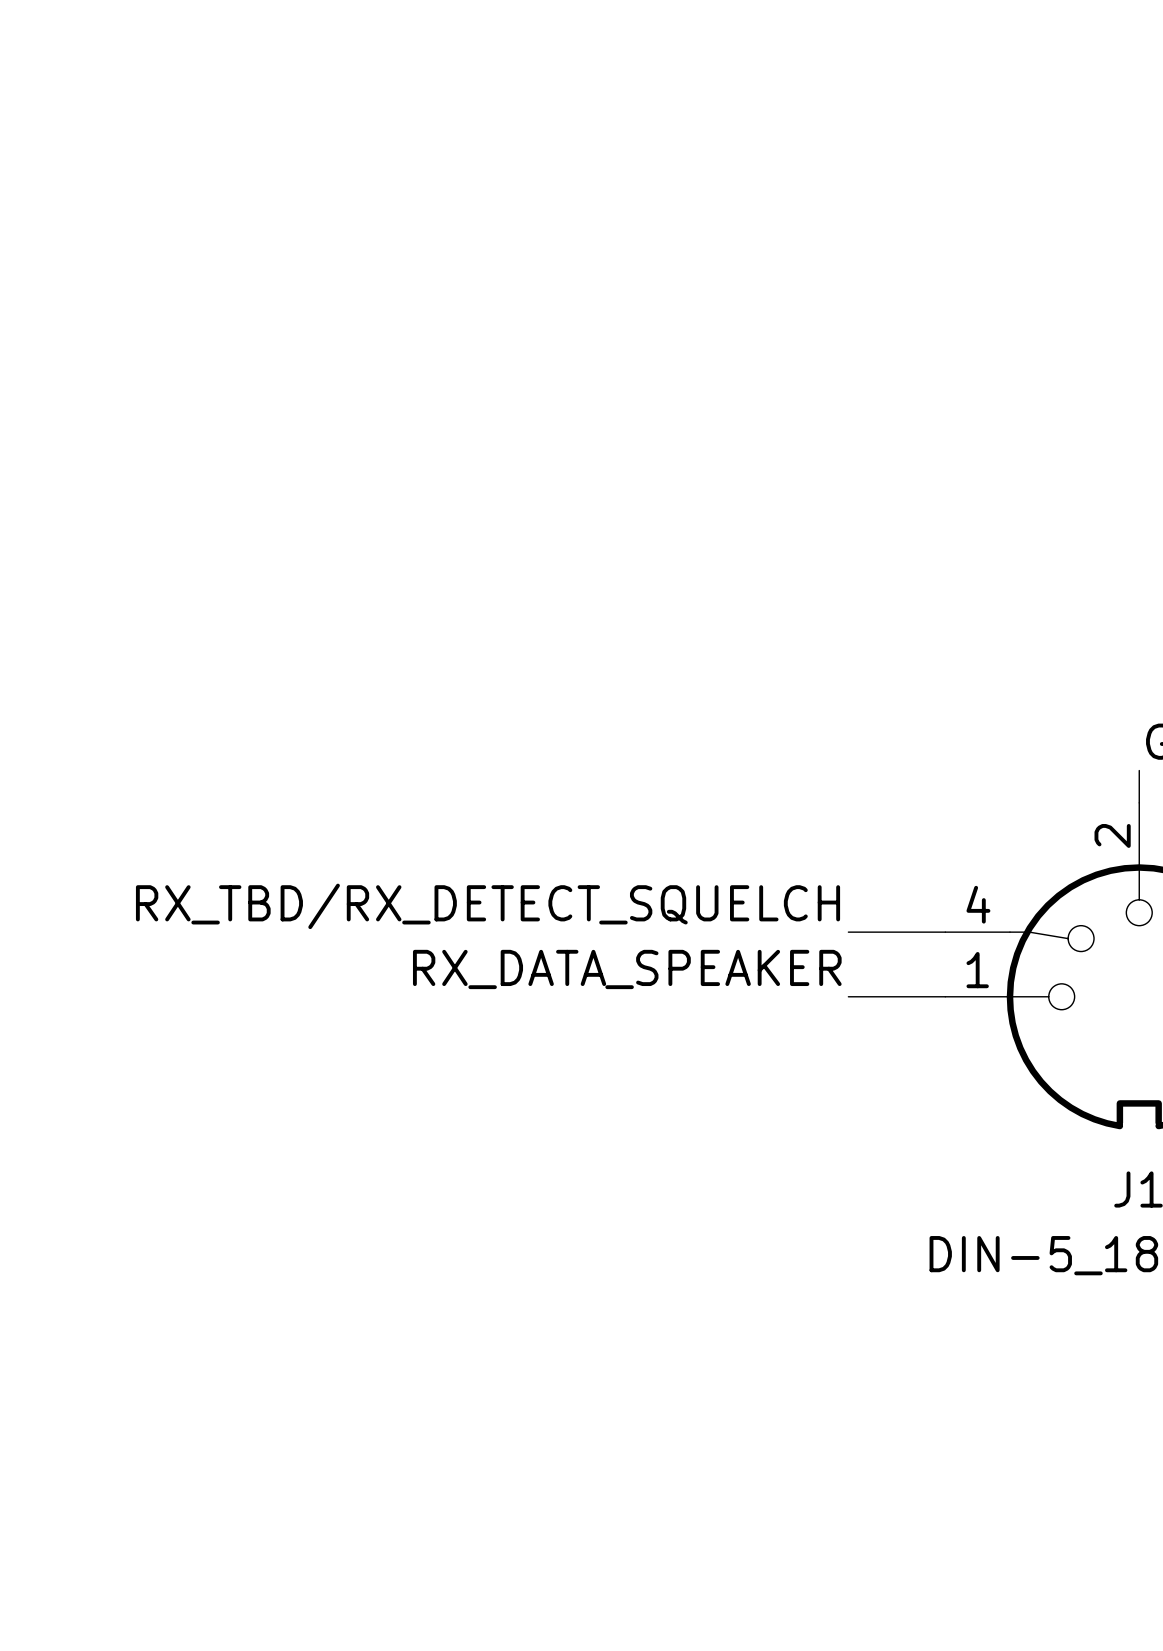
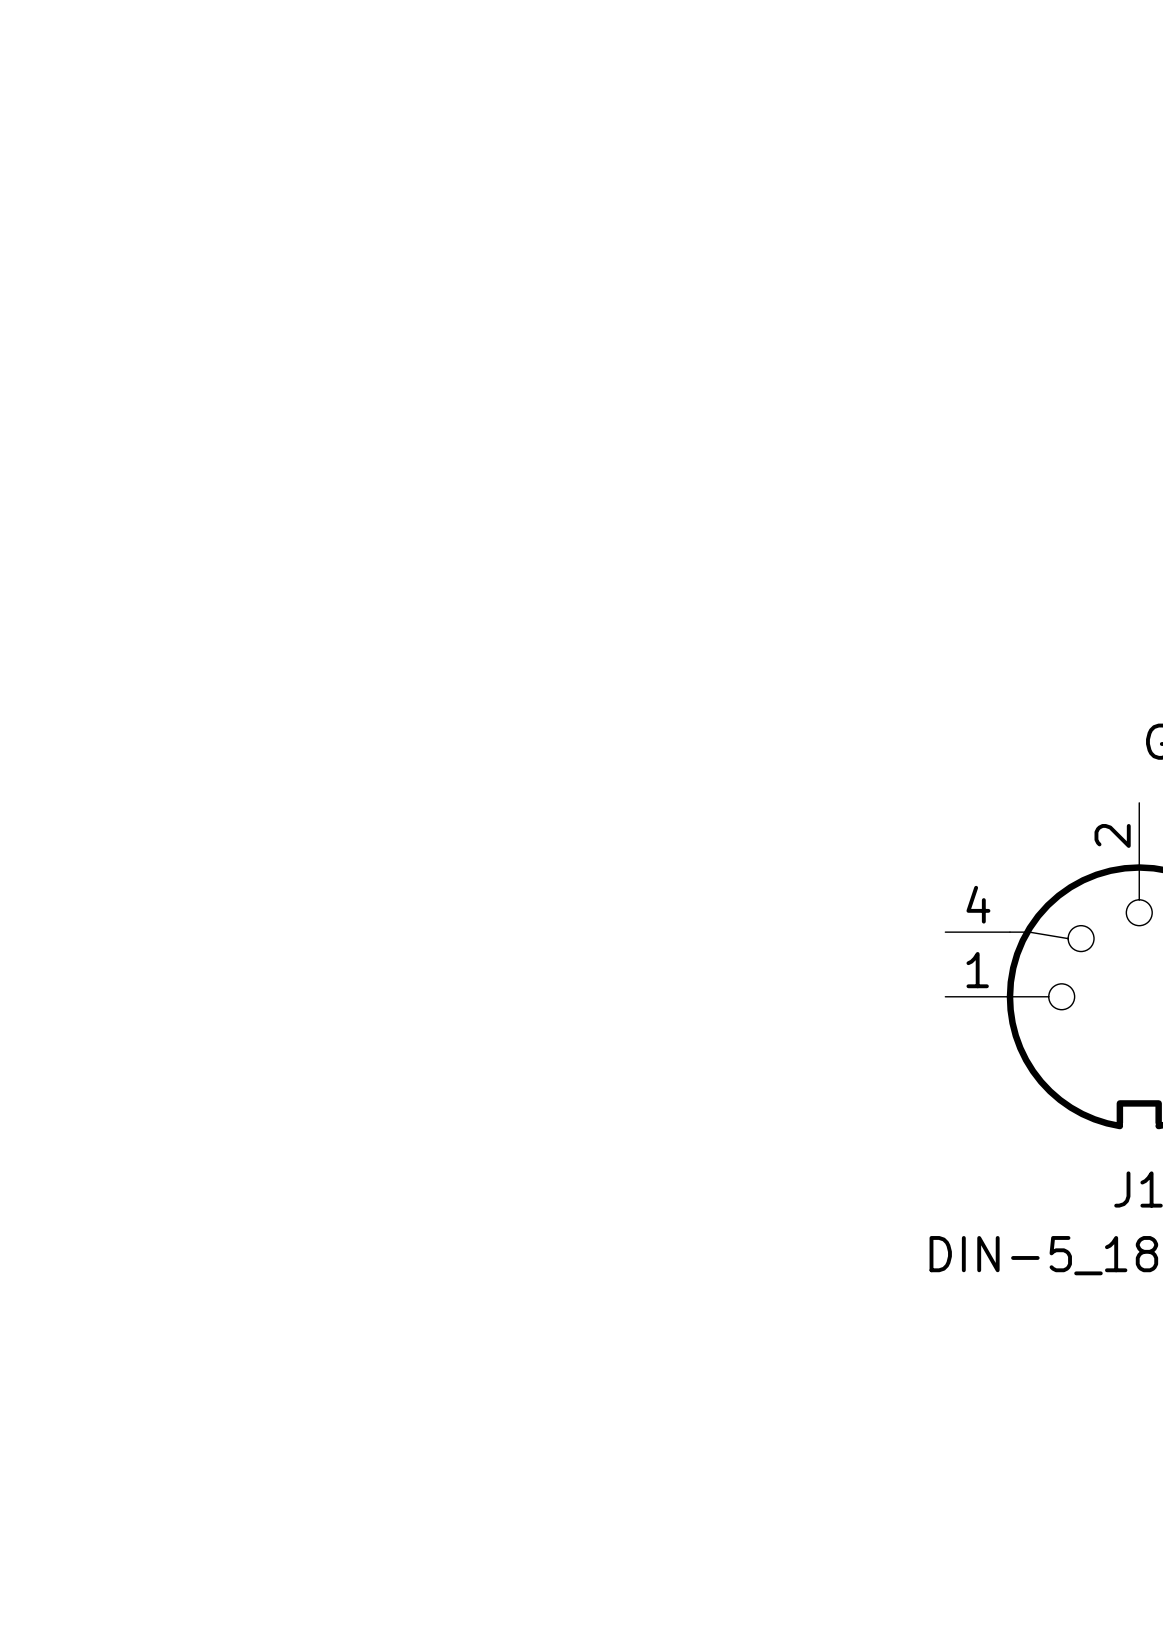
wire: (1139, 770) (1139, 802) -> none
label: RX_TBD/RX_DETECT_SQUELCH (488, 906) -> none
wire: (848, 932) (945, 932) -> none
label: RX_DATA_SPEAKER (627, 969) -> none
wire: (848, 996) (945, 996) -> none

